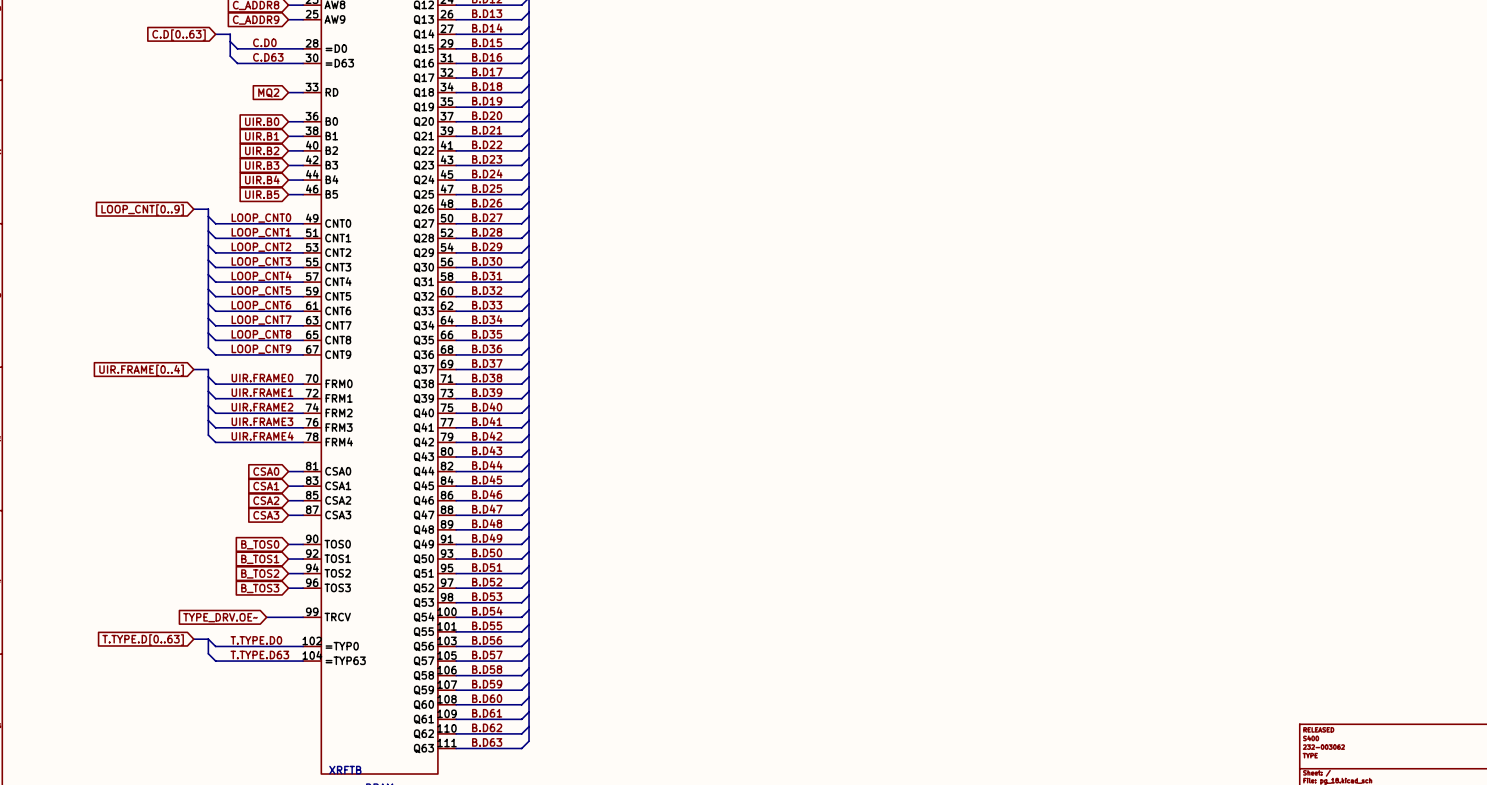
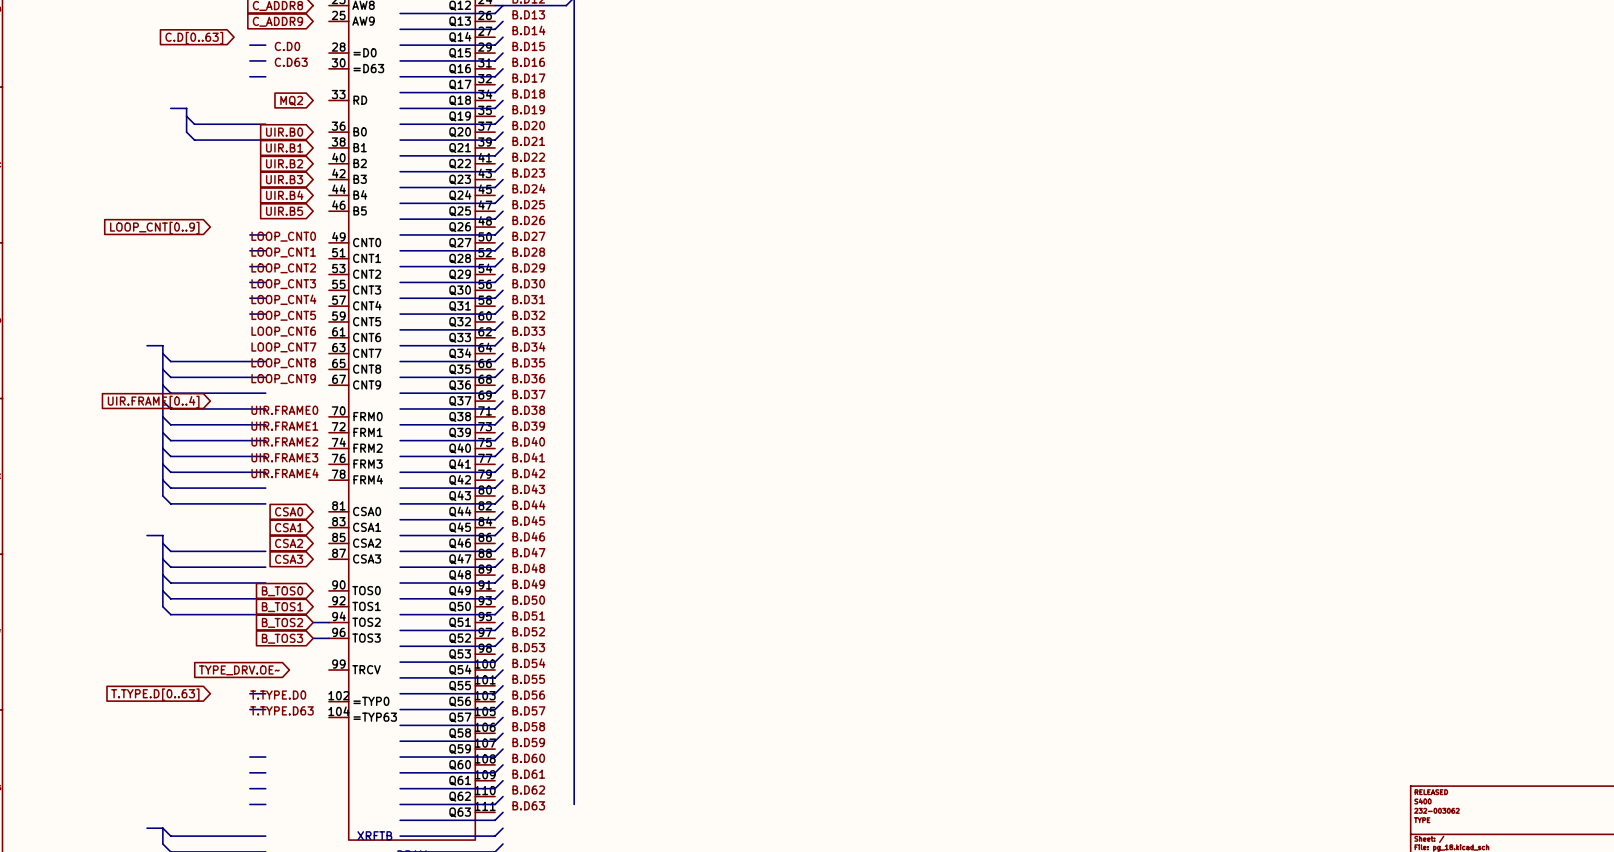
wire: (288, 5) (303, 5) -> none
wire: none -> (502, 5) (495, 13) (400, 13)
wire: (529, 12) (521, 19) (456, 19) -> none
wire: (288, 19) (303, 19) -> none
wire: none -> (502, 21) (495, 29) (400, 29)
wire: (529, 27) (521, 34) (456, 34) -> none
bus: (215, 34) (230, 34) (230, 56) -> none
wire: none -> (502, 37) (495, 45) (400, 45)
wire: (230, 41) (237, 48) (303, 48) -> (249, 45) (265, 45)
wire: (529, 41) (521, 48) (456, 48) -> none
wire: none -> (502, 53) (495, 60) (400, 60)
wire: (230, 56) (237, 63) (303, 63) -> (249, 60) (265, 60)
wire: (529, 56) (521, 63) (456, 63) -> none
wire: none -> (502, 68) (495, 76) (400, 76)
wire: (529, 70) (521, 78) (456, 78) -> none
wire: none -> (502, 84) (495, 92) (400, 92)
wire: (529, 85) (521, 92) (456, 92) -> none
wire: (288, 92) (303, 92) -> (249, 76) (265, 76)
wire: none -> (502, 100) (495, 108) (400, 108)
bus: none -> (170, 108) (186, 108) (186, 132)
wire: (529, 99) (521, 107) (456, 107) -> none
wire: none -> (186, 116) (194, 124) (265, 124)
wire: none -> (502, 116) (495, 124) (400, 124)
wire: (529, 114) (521, 121) (456, 121) -> none
wire: none -> (186, 132) (194, 140) (265, 140)
wire: (288, 121) (303, 121) -> none
wire: none -> (502, 132) (495, 140) (400, 140)
wire: (529, 129) (521, 136) (456, 136) -> none
wire: (288, 136) (303, 136) -> none
wire: none -> (502, 147) (495, 155) (400, 155)
wire: (529, 143) (521, 150) (456, 150) -> none
wire: (288, 150) (303, 150) -> none
wire: none -> (502, 163) (495, 171) (400, 171)
wire: (529, 158) (521, 165) (456, 165) -> none
wire: (288, 165) (303, 165) -> none
wire: none -> (502, 179) (495, 187) (400, 187)
wire: (529, 172) (521, 180) (456, 180) -> none
wire: (288, 180) (303, 180) -> (249, 234) (265, 234)
wire: none -> (502, 195) (495, 203) (400, 203)
wire: (529, 187) (521, 194) (456, 194) -> none
wire: (288, 194) (303, 194) -> (249, 250) (265, 250)
wire: none -> (502, 211) (495, 219) (400, 219)
wire: (529, 201) (521, 209) (456, 209) -> none
bus: (193, 209) (208, 209) (208, 347) -> none
wire: none -> (502, 227) (495, 234) (400, 234)
wire: (208, 216) (215, 223) (303, 223) -> none
wire: (529, 216) (521, 223) (456, 223) -> none
wire: none -> (502, 242) (495, 250) (400, 250)
wire: (208, 231) (215, 238) (303, 238) -> none
wire: (529, 231) (521, 238) (456, 238) -> none
wire: none -> (502, 258) (495, 266) (400, 266)
wire: (208, 245) (215, 252) (303, 252) -> none
wire: none -> (249, 266) (265, 266)
wire: (529, 245) (521, 252) (456, 252) -> none
wire: none -> (502, 274) (495, 282) (400, 282)
wire: (208, 260) (215, 267) (303, 267) -> none
wire: none -> (249, 282) (265, 282)
wire: (529, 260) (521, 267) (456, 267) -> none
wire: none -> (502, 290) (495, 298) (400, 298)
wire: (208, 274) (215, 282) (303, 282) -> none
wire: none -> (249, 298) (265, 298)
wire: (529, 274) (521, 282) (456, 282) -> none
wire: none -> (502, 306) (495, 314) (400, 314)
wire: (208, 289) (215, 296) (303, 296) -> (162, 353) (170, 361) (265, 361)
wire: none -> (249, 314) (265, 314)
wire: (529, 289) (521, 296) (456, 296) -> none
wire: none -> (502, 321) (495, 329) (400, 329)
wire: (208, 303) (215, 311) (303, 311) -> (162, 369) (170, 377) (265, 377)
wire: (529, 303) (521, 311) (456, 311) -> none
wire: none -> (502, 337) (495, 345) (400, 345)
bus: none -> (147, 345) (162, 345) (162, 495)
wire: (208, 318) (215, 325) (303, 325) -> (162, 385) (170, 393) (265, 393)
wire: (529, 318) (521, 325) (456, 325) -> none
wire: none -> (502, 353) (495, 361) (400, 361)
wire: (208, 333) (215, 340) (303, 340) -> (162, 401) (170, 408) (265, 408)
wire: (529, 333) (521, 340) (456, 340) -> none
wire: none -> (502, 369) (495, 377) (400, 377)
wire: (208, 347) (215, 354) (303, 354) -> (162, 416) (170, 424) (265, 424)
wire: (529, 347) (521, 354) (456, 354) -> none
wire: none -> (502, 385) (495, 393) (400, 393)
wire: (529, 362) (521, 369) (456, 369) -> none
bus: (193, 369) (208, 369) (208, 435) -> none
wire: none -> (502, 401) (495, 408) (400, 408)
wire: (208, 376) (215, 384) (303, 384) -> (162, 448) (170, 456) (265, 456)
wire: (529, 376) (521, 384) (456, 384) -> none
wire: none -> (502, 416) (495, 424) (400, 424)
wire: (208, 391) (215, 398) (303, 398) -> (162, 464) (170, 472) (265, 472)
wire: (529, 391) (521, 398) (456, 398) -> none
wire: none -> (502, 432) (495, 440) (400, 440)
wire: (208, 405) (215, 413) (303, 413) -> (162, 480) (170, 488) (265, 488)
wire: (529, 405) (521, 413) (456, 413) -> none
wire: none -> (502, 448) (495, 456) (400, 456)
wire: (208, 420) (215, 427) (303, 427) -> (162, 495) (170, 503) (265, 503)
wire: (529, 420) (521, 427) (456, 427) -> none
wire: none -> (502, 464) (495, 472) (400, 472)
wire: (208, 435) (215, 442) (303, 442) -> (162, 432) (170, 440) (265, 440)
wire: (529, 435) (521, 442) (456, 442) -> none
wire: none -> (502, 480) (495, 488) (400, 488)
wire: (529, 449) (521, 456) (456, 456) -> none
wire: none -> (502, 495) (495, 503) (400, 503)
wire: (529, 464) (521, 471) (456, 471) -> none
wire: (288, 471) (303, 471) -> none
wire: none -> (502, 511) (495, 519) (400, 519)
wire: (529, 478) (521, 486) (456, 486) -> none
wire: (288, 486) (303, 486) -> none
wire: none -> (502, 527) (495, 535) (400, 535)
bus: none -> (147, 535) (162, 535) (162, 606)
wire: (529, 493) (521, 500) (456, 500) -> none
wire: none -> (162, 543) (170, 551) (265, 551)
wire: (288, 500) (303, 500) -> none
wire: none -> (502, 543) (495, 551) (400, 551)
wire: (529, 508) (521, 515) (456, 515) -> none
wire: none -> (162, 559) (170, 567) (265, 567)
wire: (288, 515) (303, 515) -> none
wire: none -> (502, 559) (495, 567) (400, 567)
wire: (529, 522) (521, 529) (456, 529) -> none
wire: none -> (162, 575) (170, 583) (265, 583)
wire: none -> (502, 575) (495, 583) (400, 583)
wire: (529, 537) (521, 544) (456, 544) -> none
wire: none -> (162, 590) (170, 598) (265, 598)
wire: (288, 544) (303, 544) -> none
wire: none -> (502, 590) (495, 598) (400, 598)
wire: (529, 551) (521, 559) (456, 559) -> none
wire: none -> (162, 606) (170, 614) (265, 614)
wire: (288, 559) (303, 559) -> none
wire: none -> (502, 606) (495, 614) (400, 614)
wire: (529, 566) (521, 573) (456, 573) -> none
wire: none -> (502, 622) (495, 630) (400, 630)
wire: (529, 580) (521, 588) (456, 588) -> none
wire: none -> (502, 638) (495, 646) (400, 646)
wire: (529, 595) (521, 602) (456, 602) -> none
wire: none -> (502, 654) (495, 662) (400, 662)
wire: (529, 610) (521, 617) (456, 617) -> none
wire: (266, 617) (303, 617) -> none
wire: none -> (502, 670) (495, 677) (400, 677)
wire: (529, 624) (521, 631) (456, 631) -> none
wire: none -> (502, 685) (495, 693) (400, 693)
bus: (193, 639) (208, 639) (208, 653) -> none
wire: (208, 639) (215, 646) (303, 646) -> none
wire: none -> (249, 693) (265, 693)
wire: (529, 639) (521, 646) (456, 646) -> none
wire: none -> (502, 701) (495, 709) (400, 709)
wire: (208, 653) (215, 661) (303, 661) -> none
wire: none -> (249, 709) (265, 709)
wire: (529, 653) (521, 661) (456, 661) -> none
wire: none -> (502, 717) (495, 725) (400, 725)
wire: (529, 668) (521, 675) (456, 675) -> none
wire: none -> (502, 733) (495, 741) (400, 741)
wire: (529, 682) (521, 690) (456, 690) -> none
wire: none -> (502, 749) (495, 757) (400, 757)
wire: none -> (249, 757) (265, 757)
wire: (529, 697) (521, 704) (456, 704) -> none
wire: none -> (502, 764) (495, 772) (400, 772)
wire: none -> (249, 772) (265, 772)
wire: (529, 712) (521, 719) (456, 719) -> none
wire: none -> (502, 780) (495, 788) (400, 788)
wire: none -> (249, 788) (265, 788)
wire: (529, 726) (521, 733) (456, 733) -> none
wire: none -> (502, 796) (495, 804) (400, 804)
wire: none -> (249, 804) (265, 804)
wire: (529, 741) (521, 748) (456, 748) -> none
wire: none -> (502, 812) (495, 820) (400, 820)
bus: none -> (147, 828) (162, 828) (162, 844)
wire: none -> (162, 828) (170, 836) (265, 836)
wire: none -> (502, 828) (495, 836) (400, 836)
wire: none -> (162, 844) (170, 851) (265, 851)
wire: none -> (502, 844) (495, 851) (400, 851)

